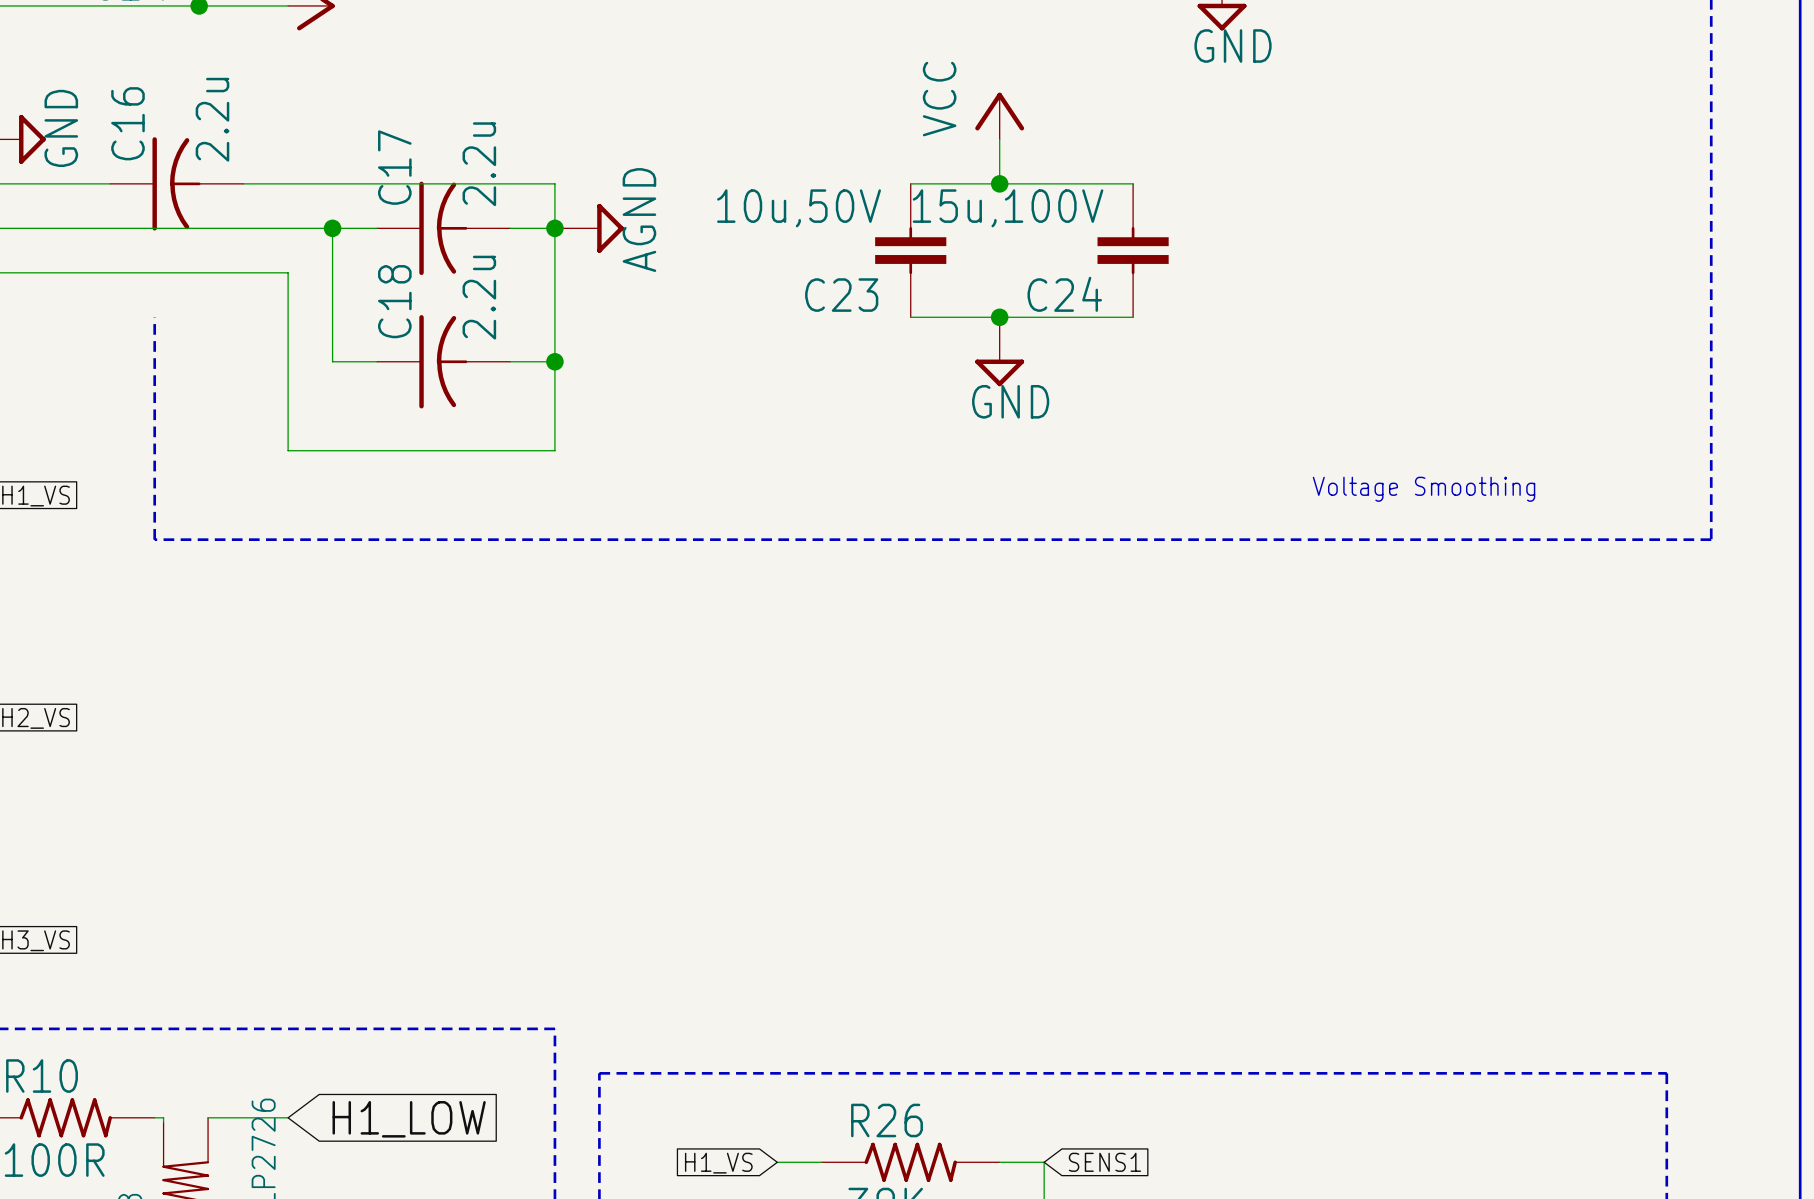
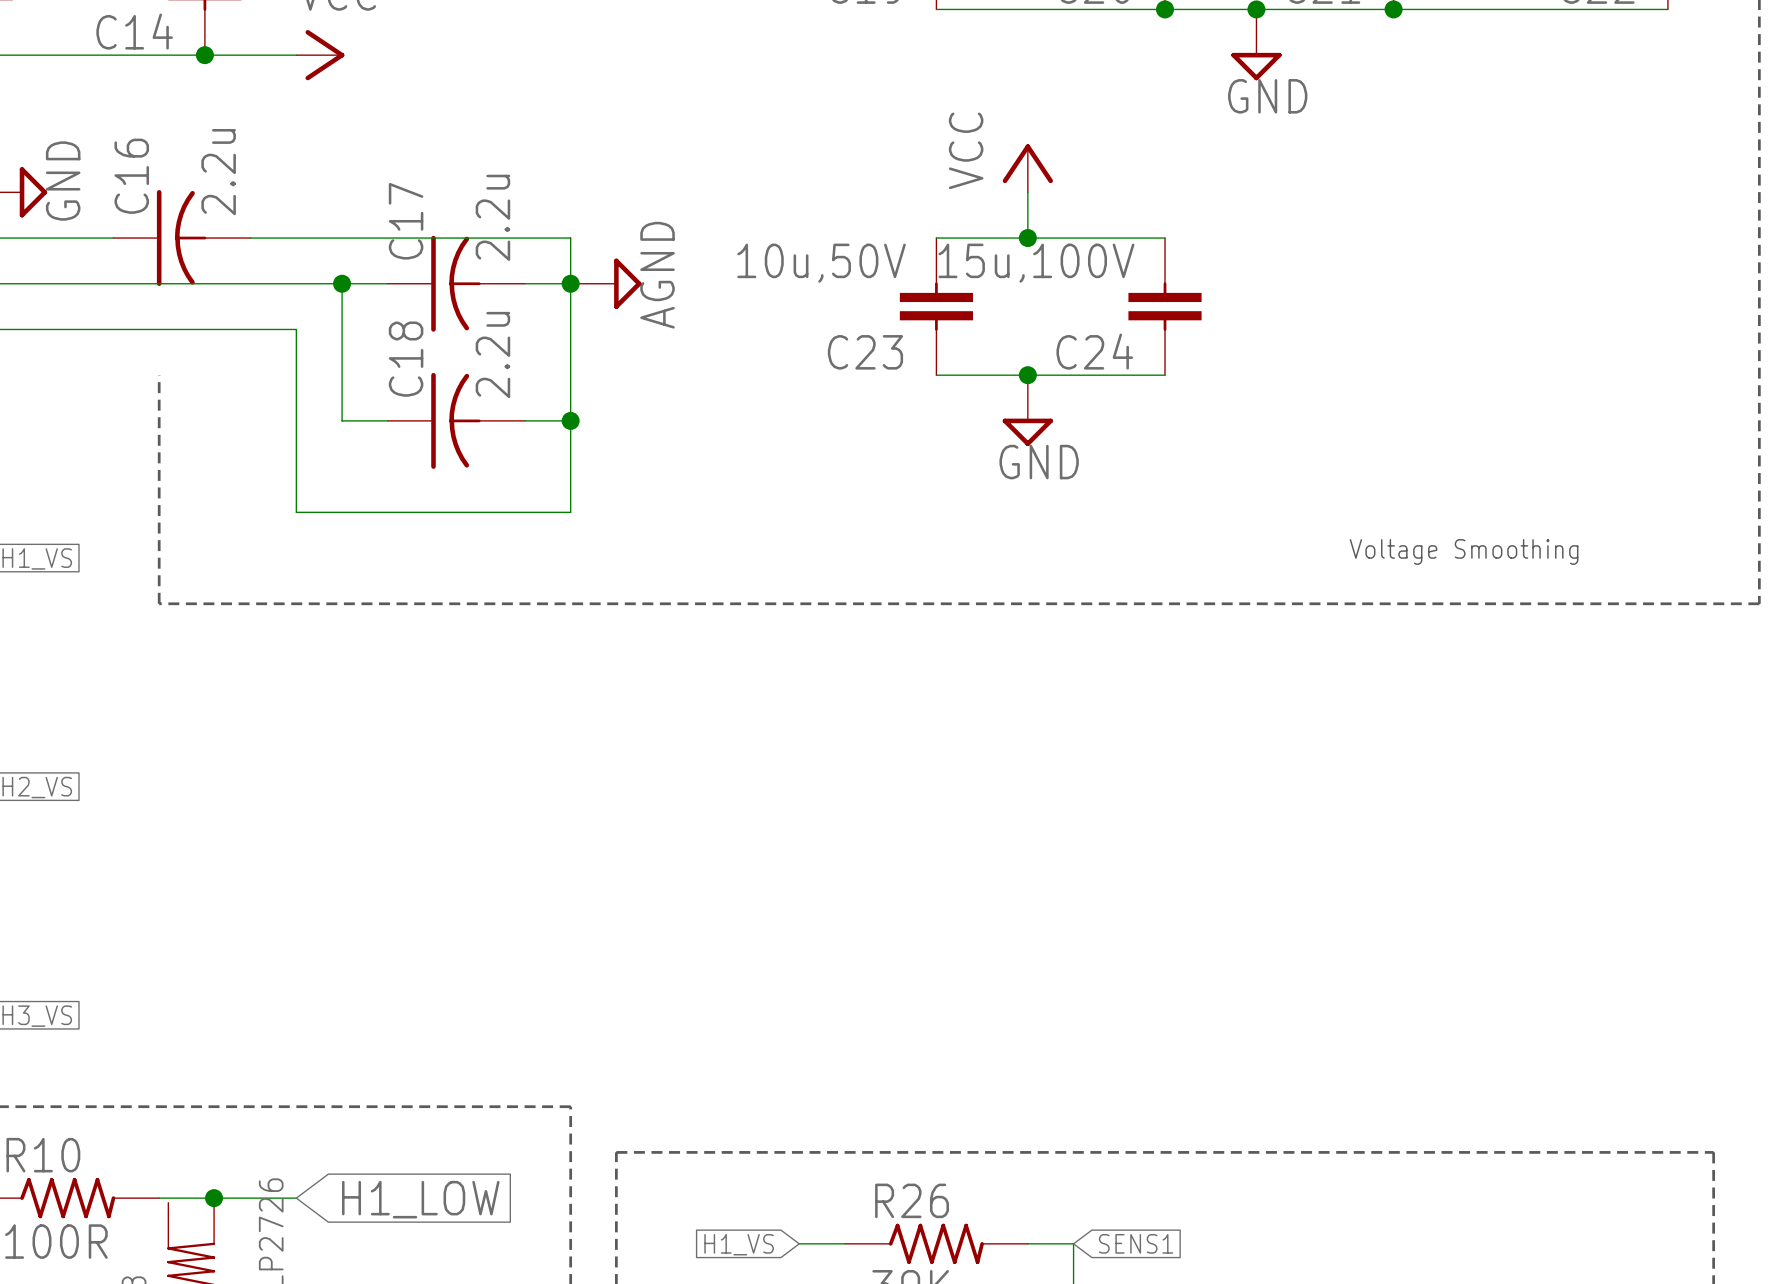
wire: (163, 1117) (163, 1122) -> (168, 1198) (214, 1198)
junction: none -> (214, 1198)

